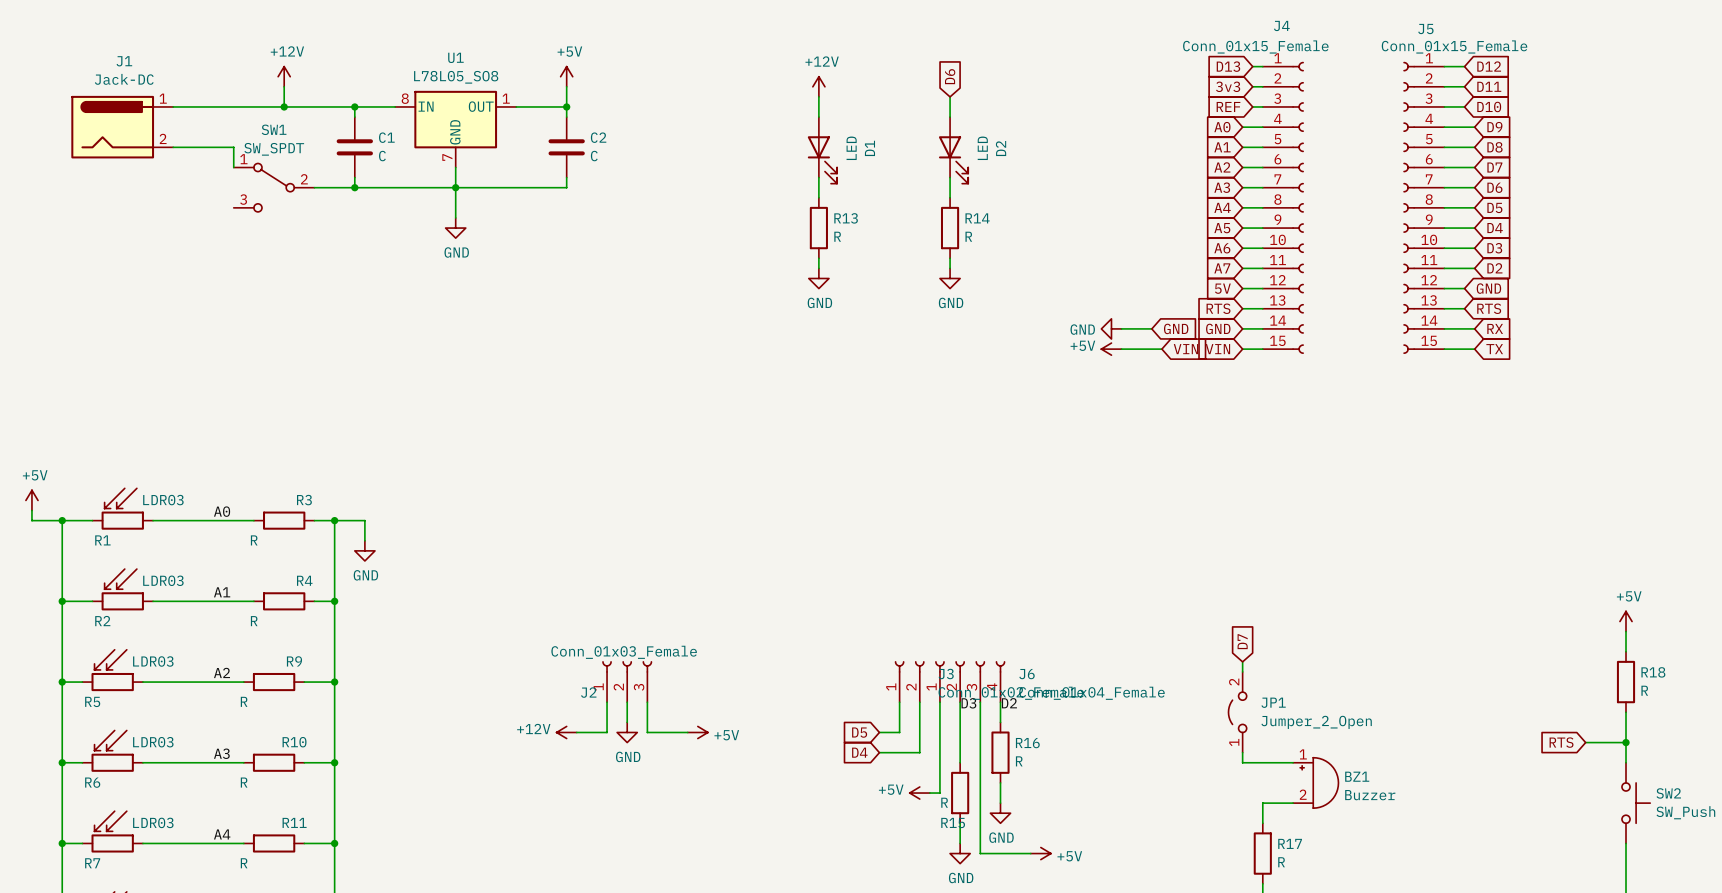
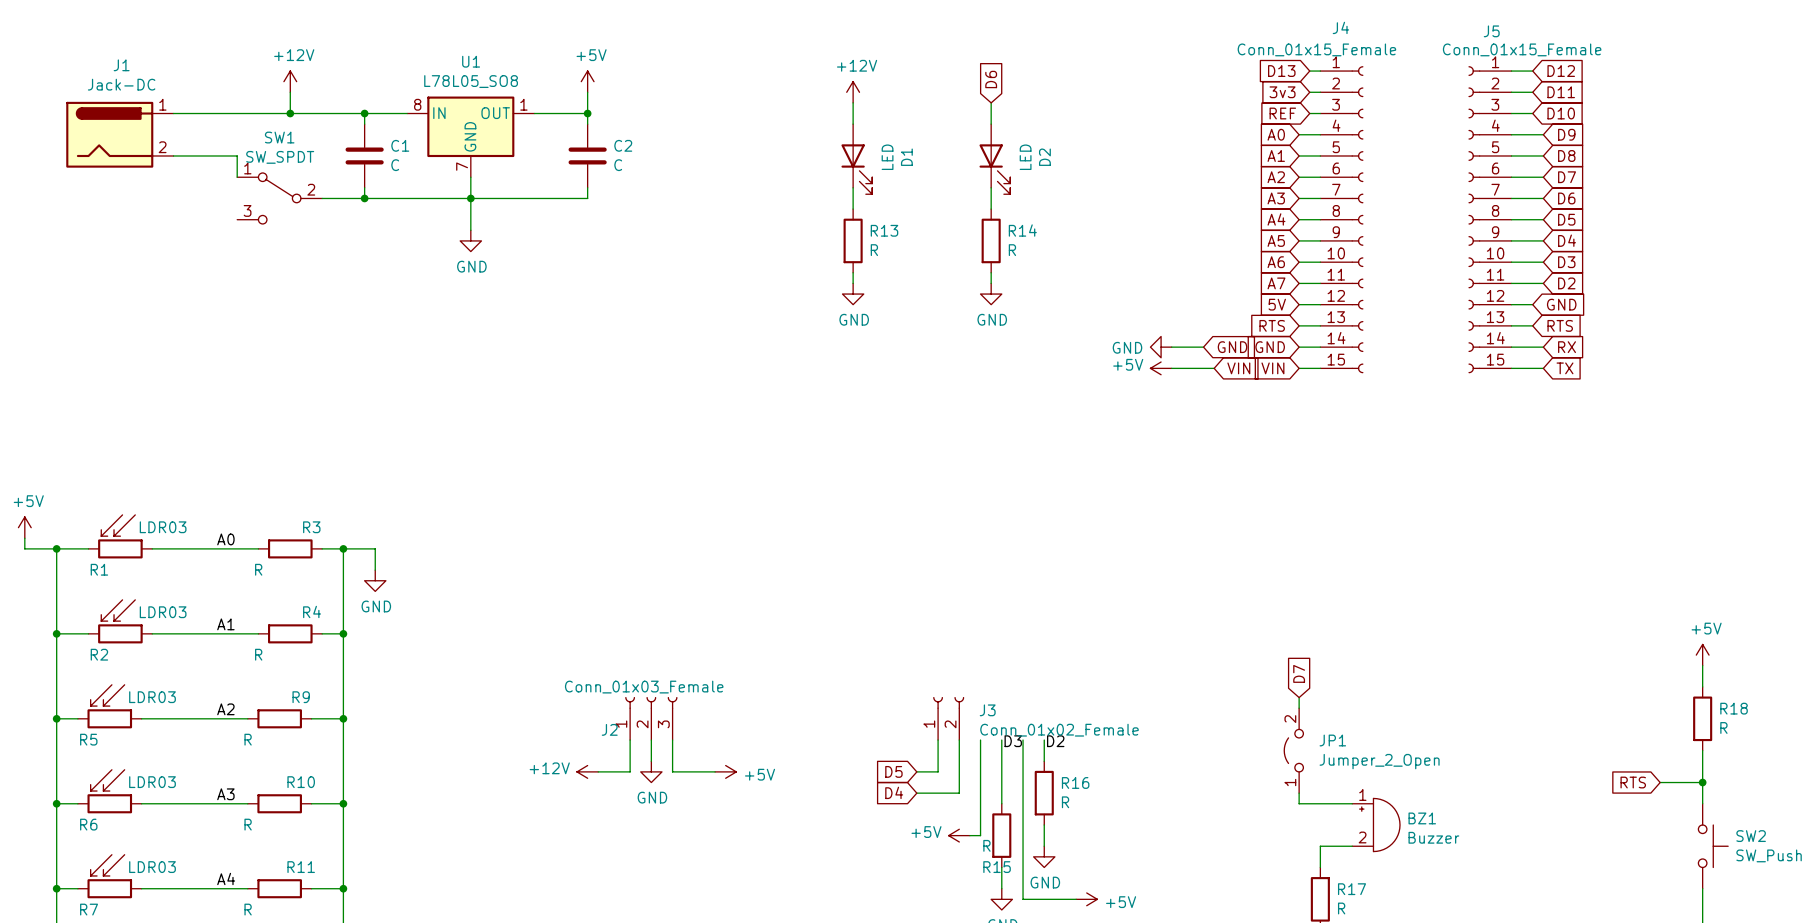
J6: Conn_01x04_Female (970, 681) -> none

